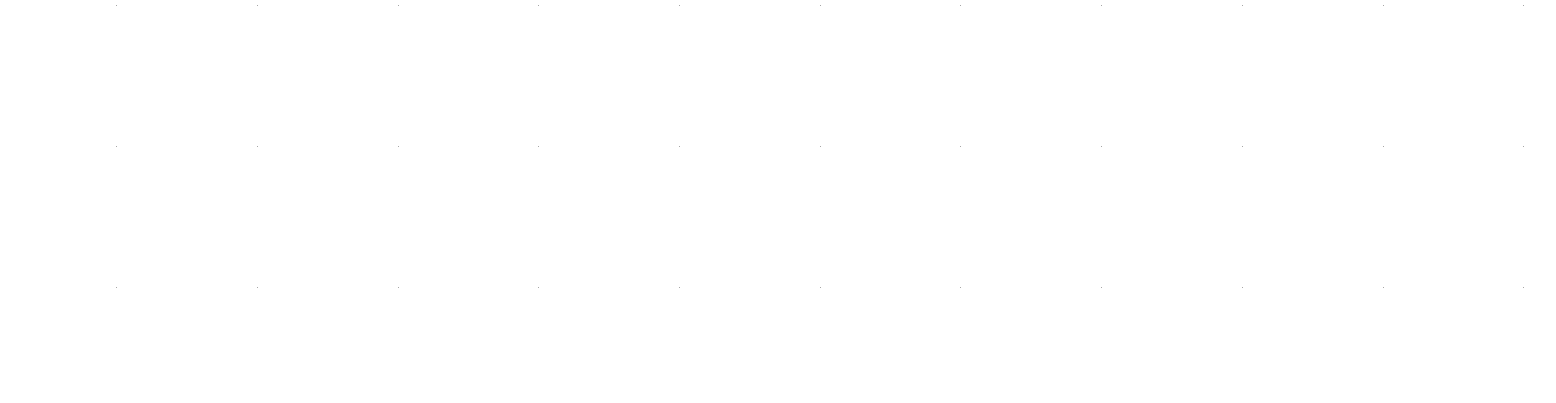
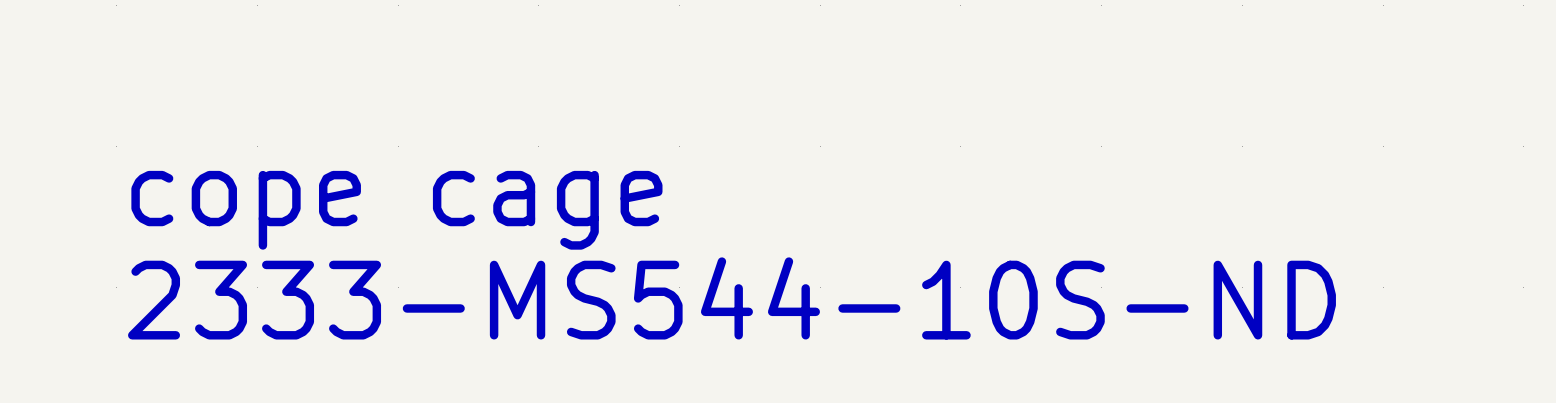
text: none -> cope cage (396, 210)
text: none -> 2333-MS544-10S-ND (731, 298)

